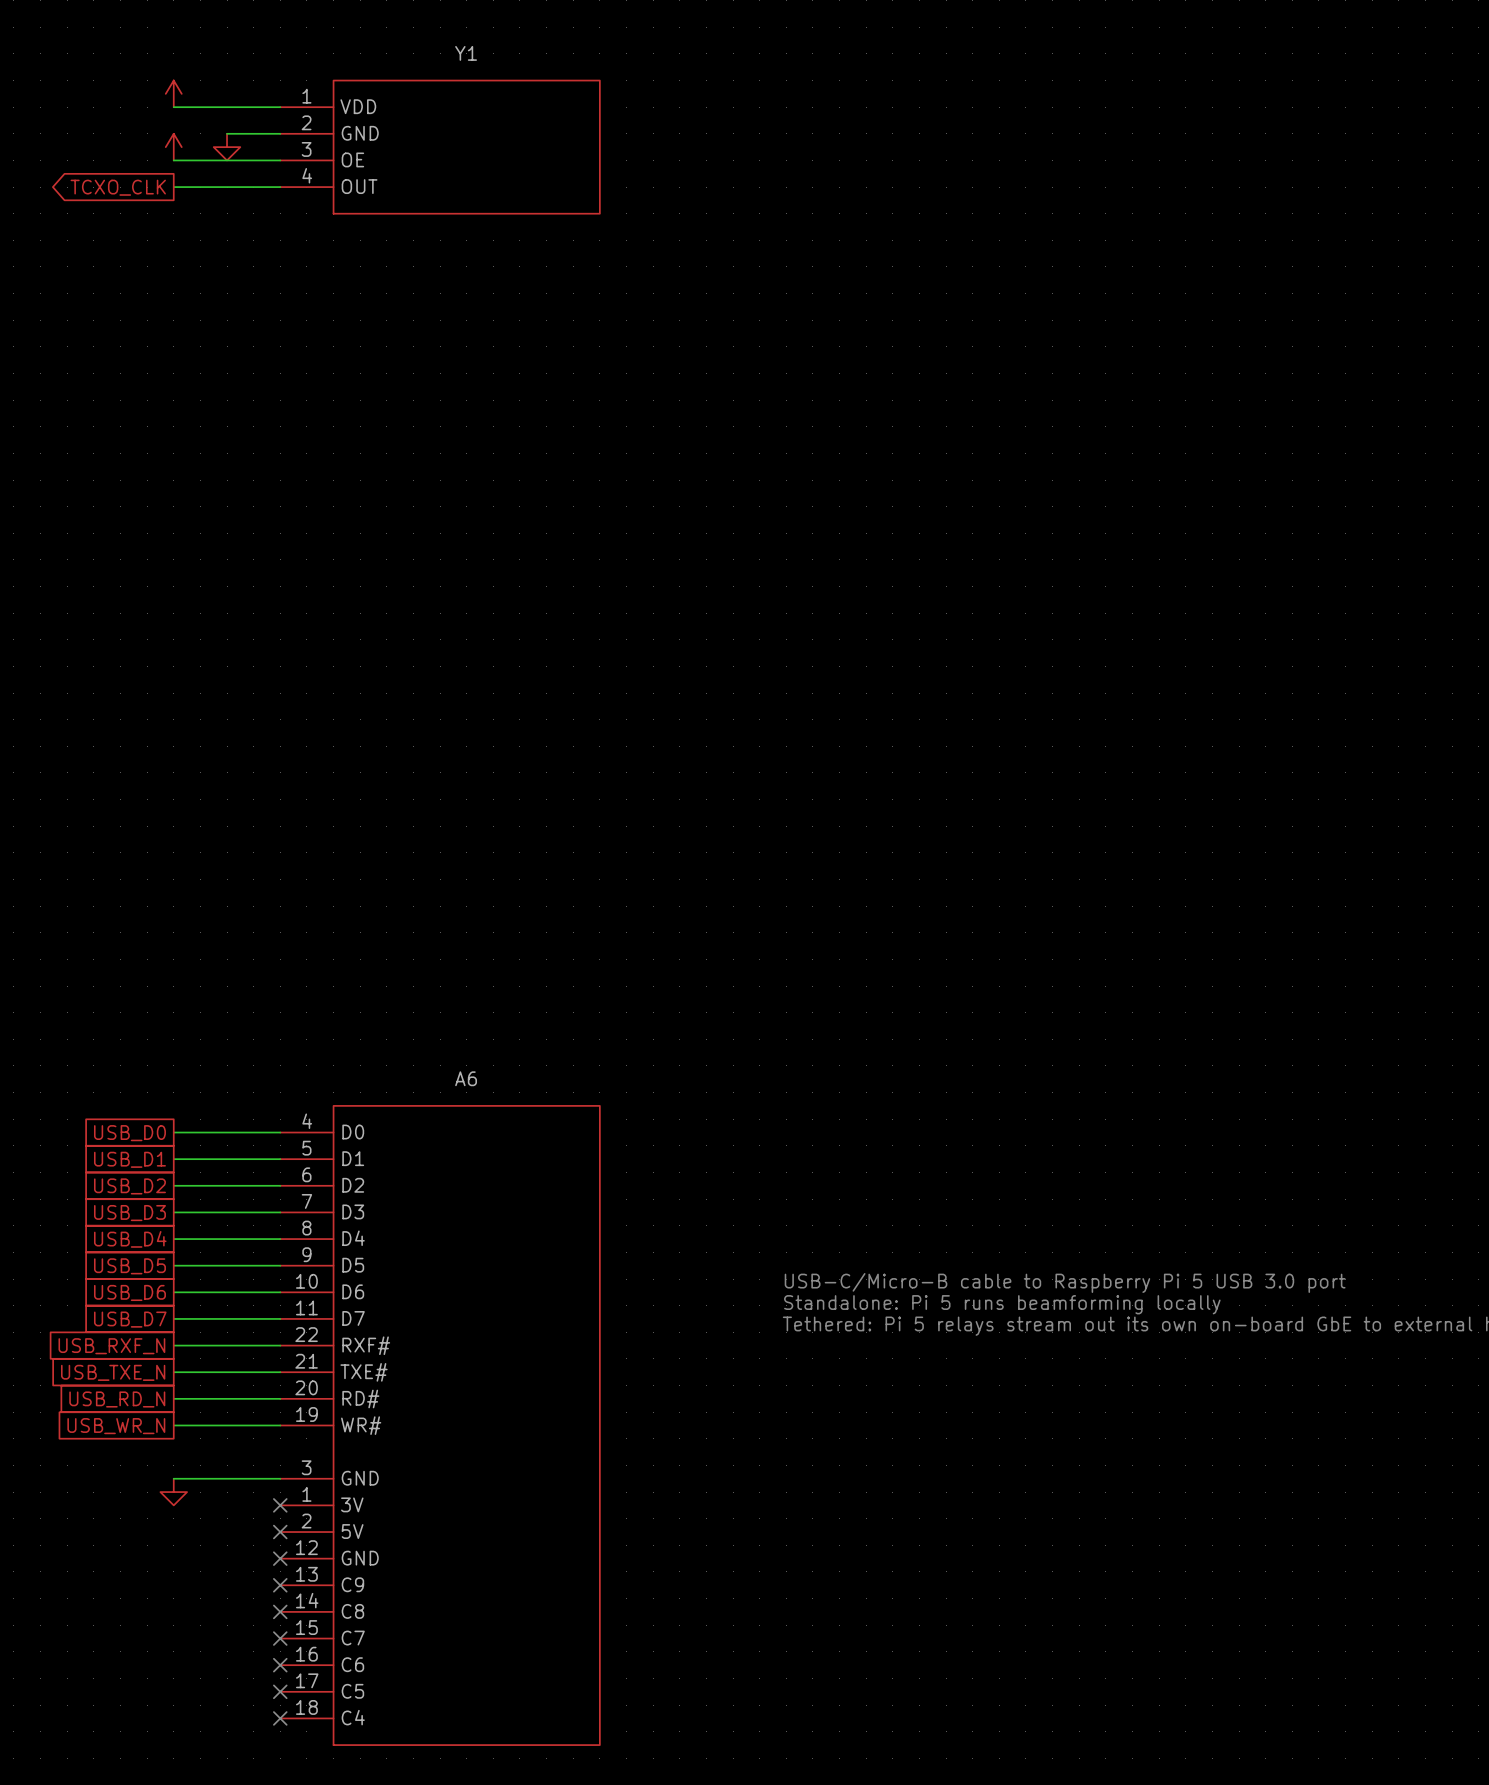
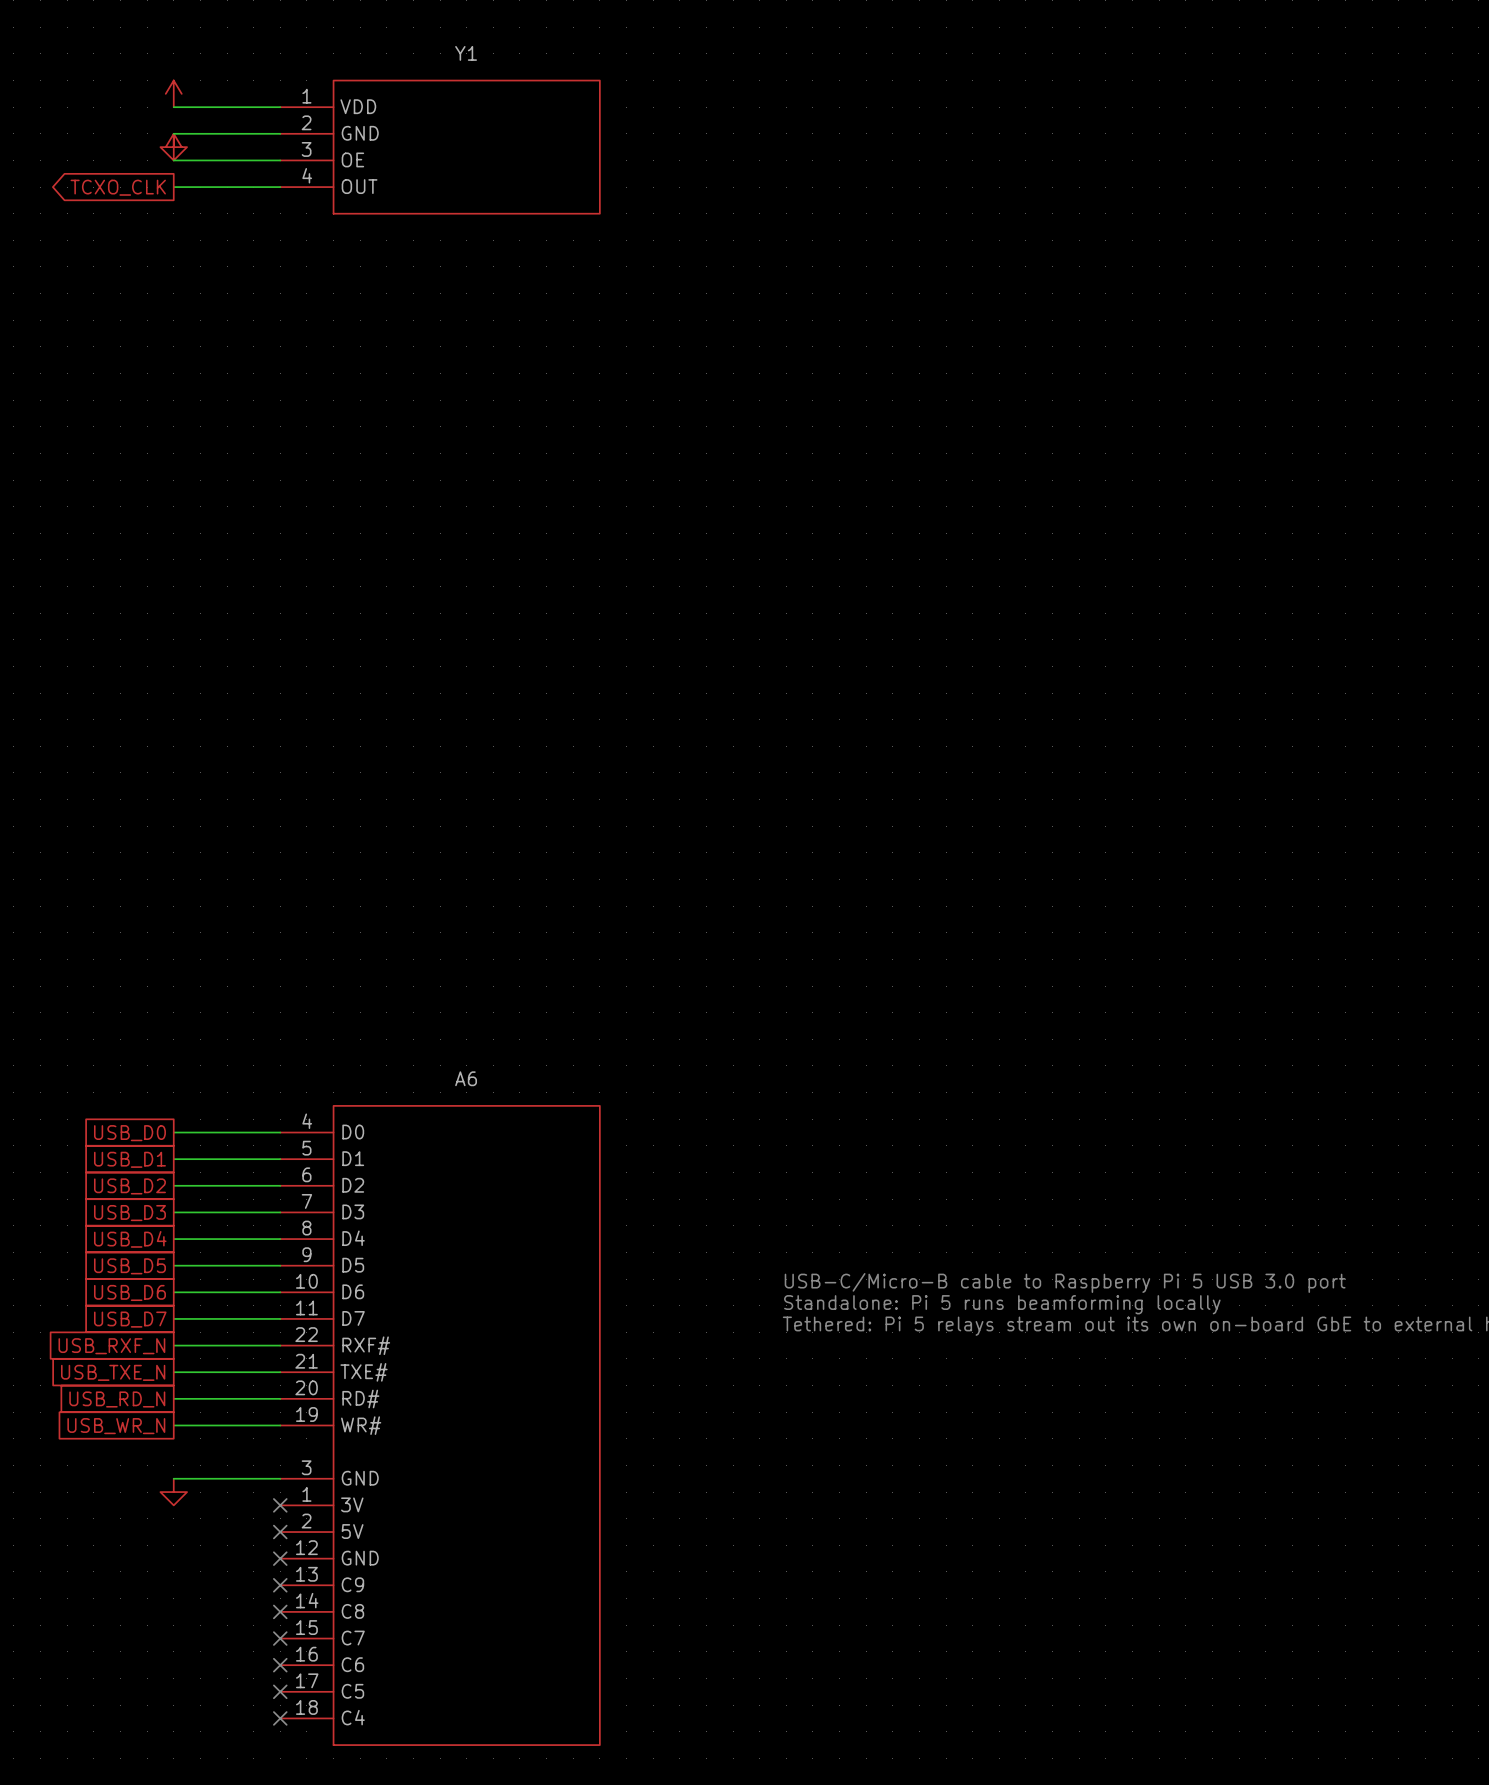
wire: none -> (173, 133) (227, 133)
power symbol position: (227, 147) -> (173, 147)

